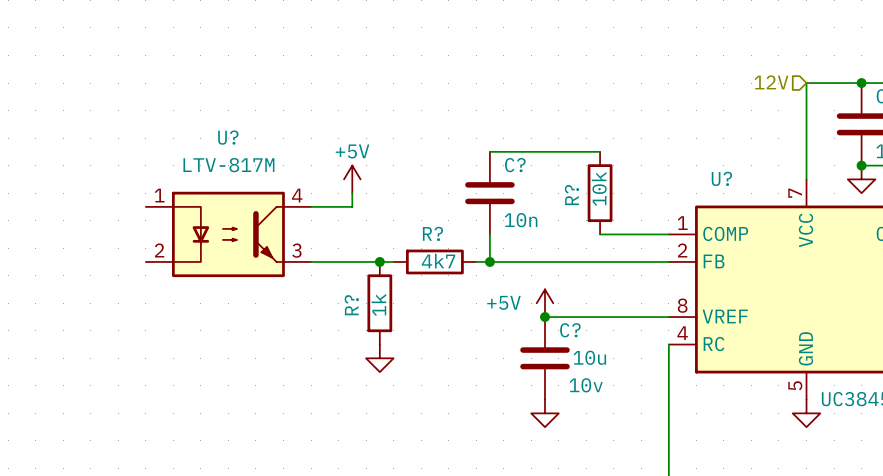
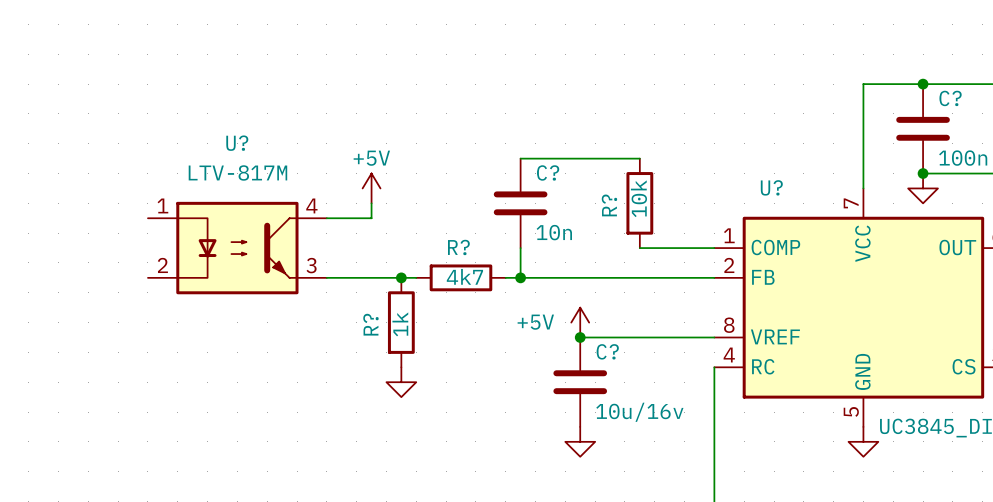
hierarchical label: 12V (771, 82) -> none
C? value: 10u (589, 357) -> 10u/16v (639, 412)
C? text: 10v (586, 385) -> none

